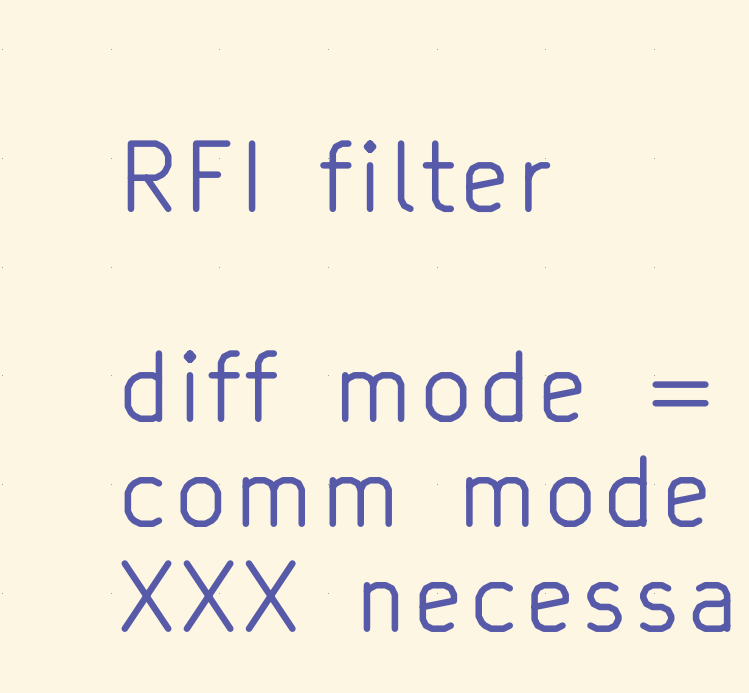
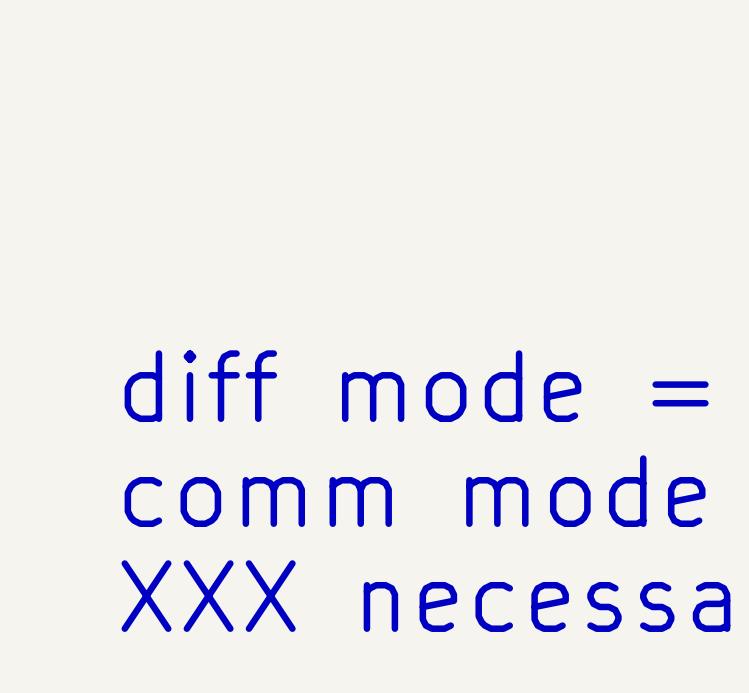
text: RFI filter (339, 176) -> none

